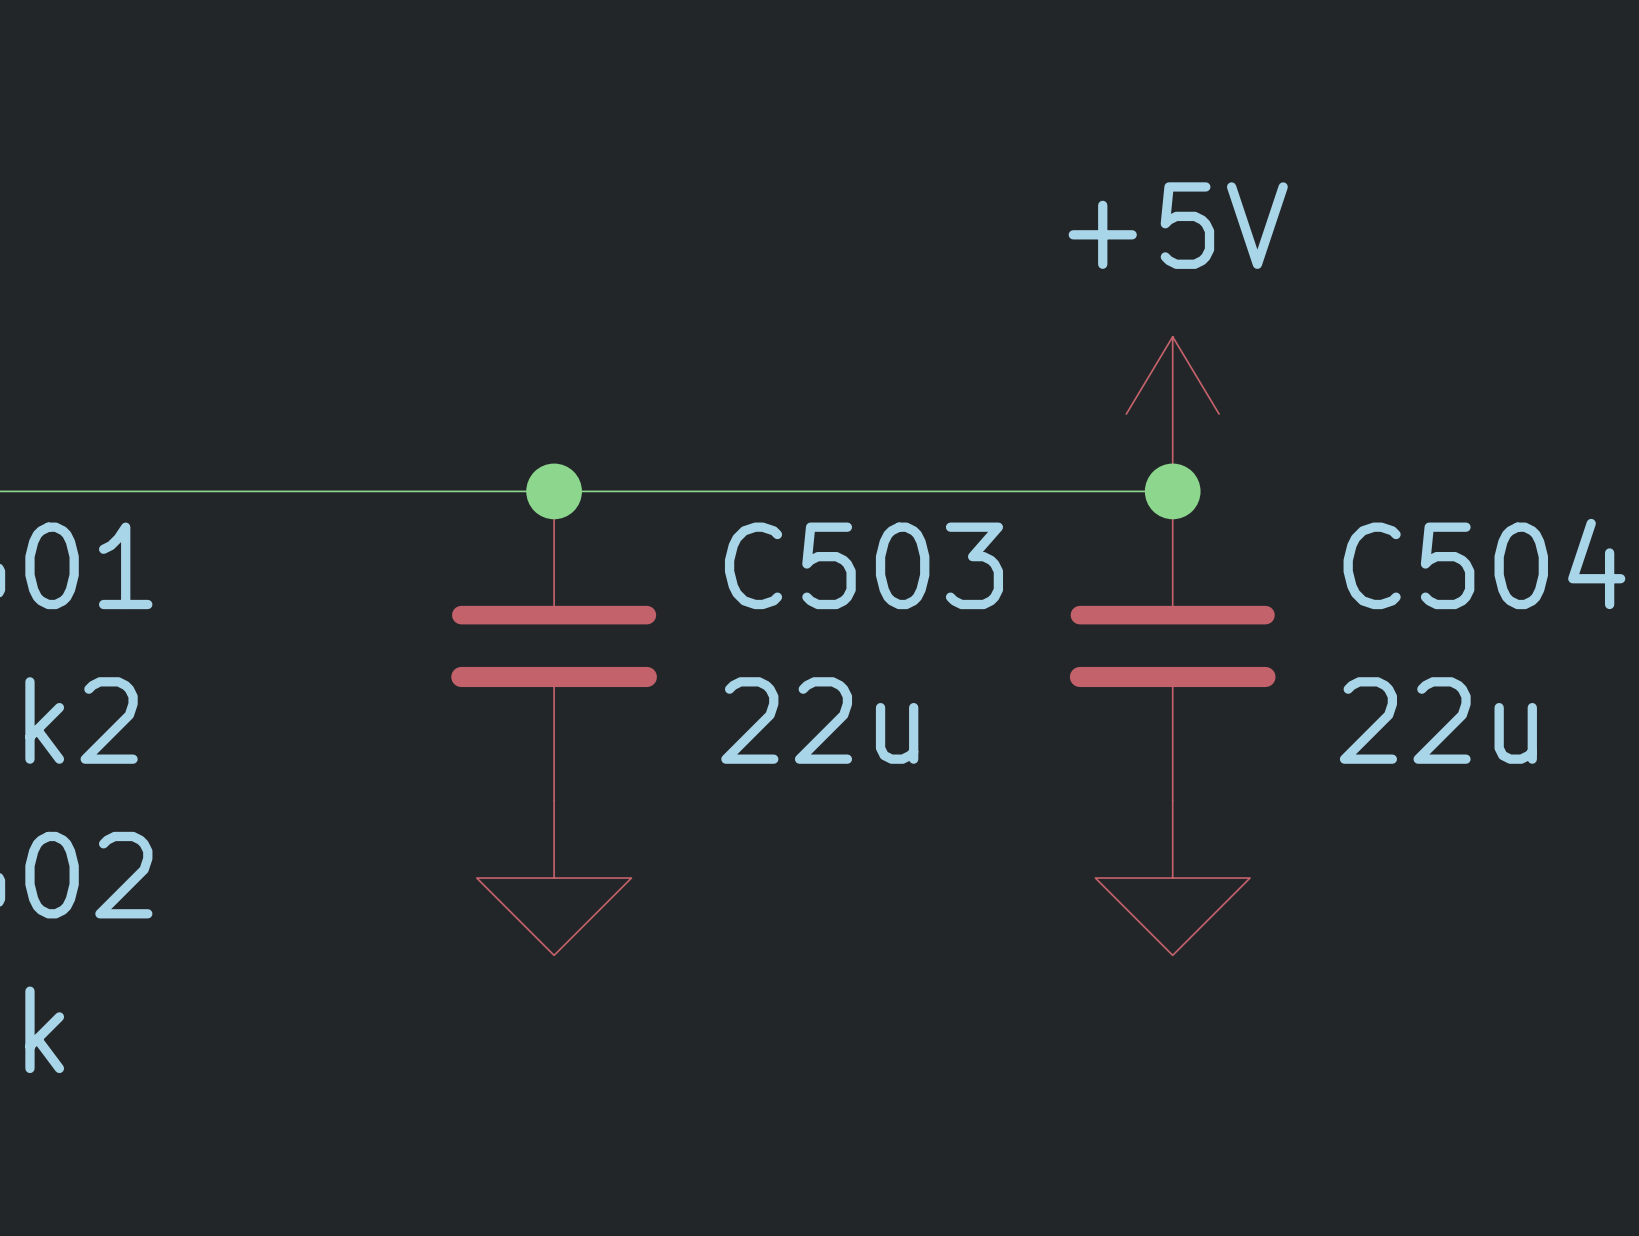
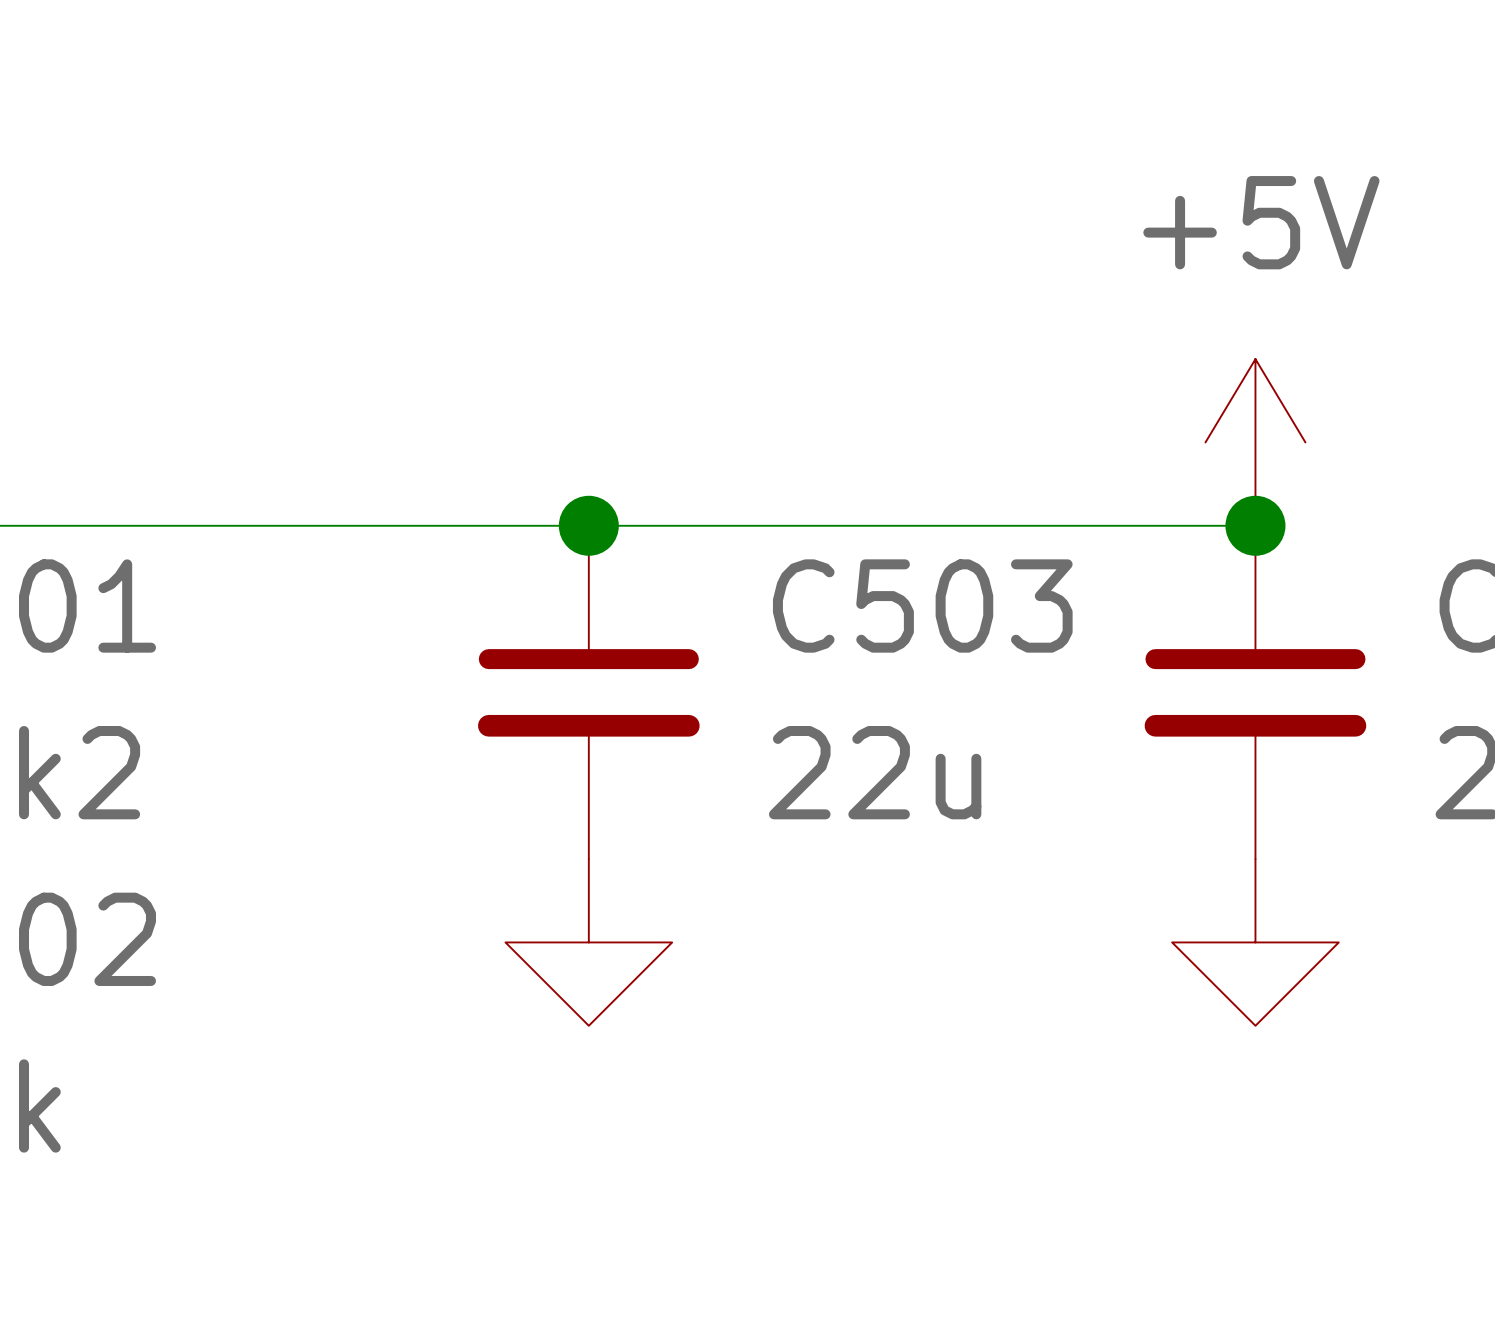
power symbol text position: +5V (1178, 225) -> +5V (1261, 222)

